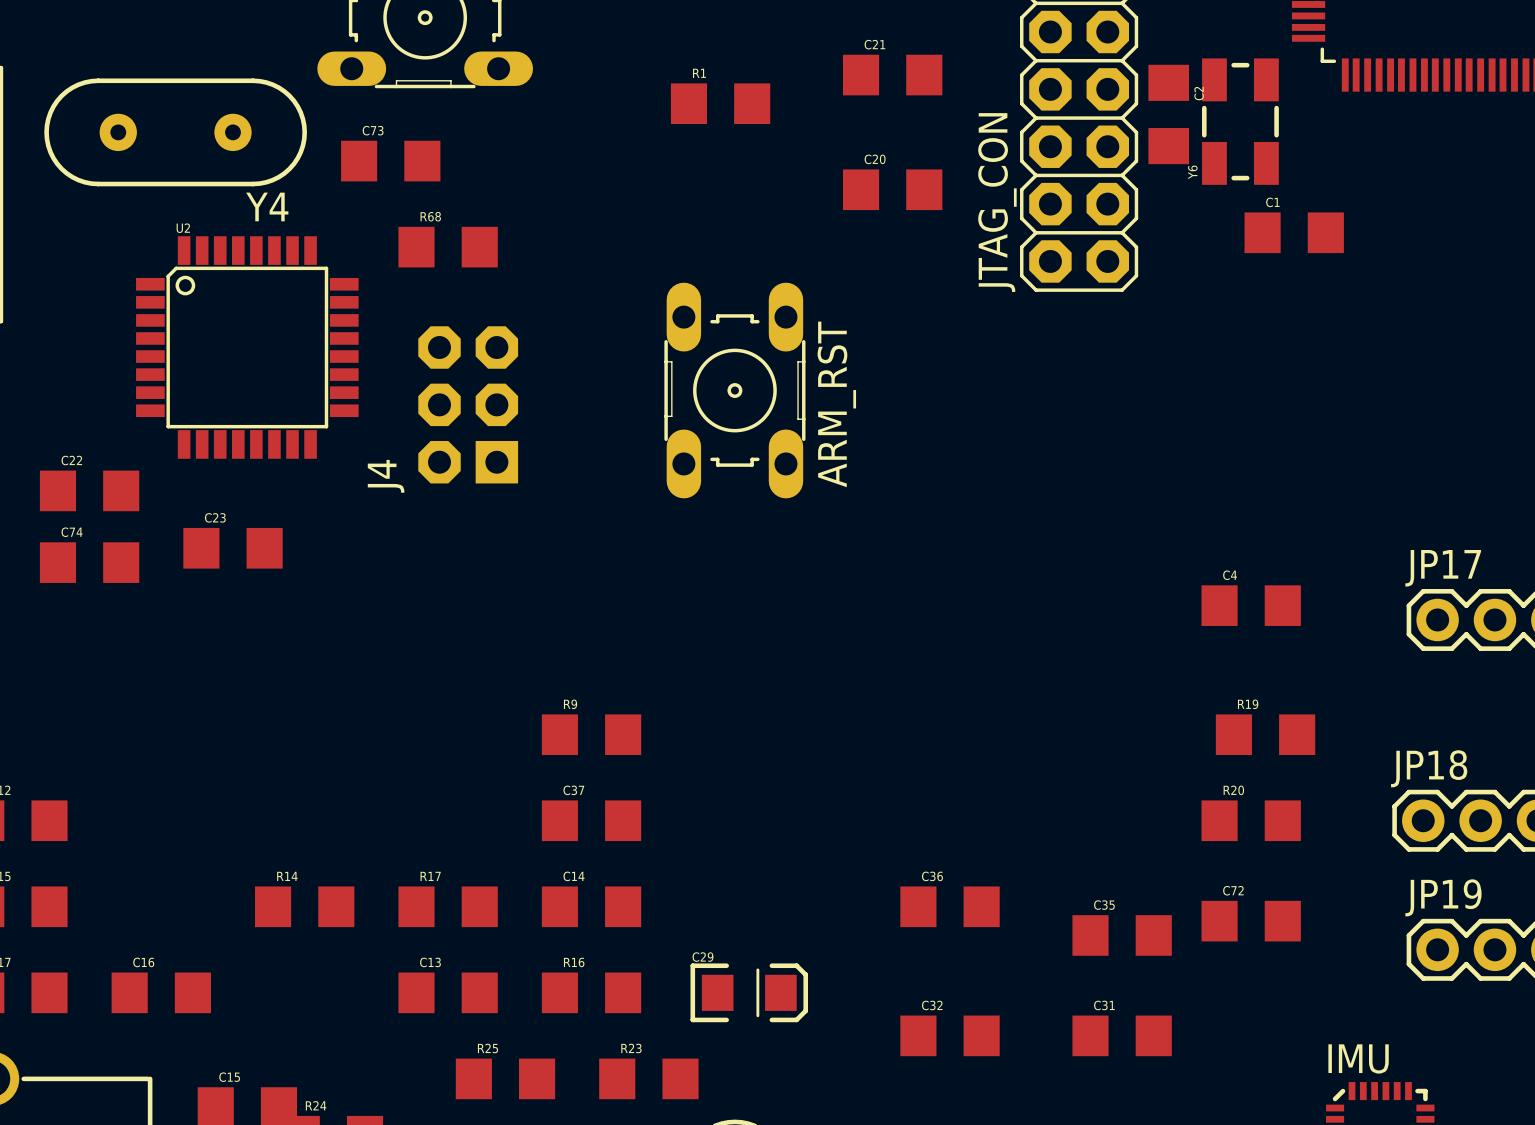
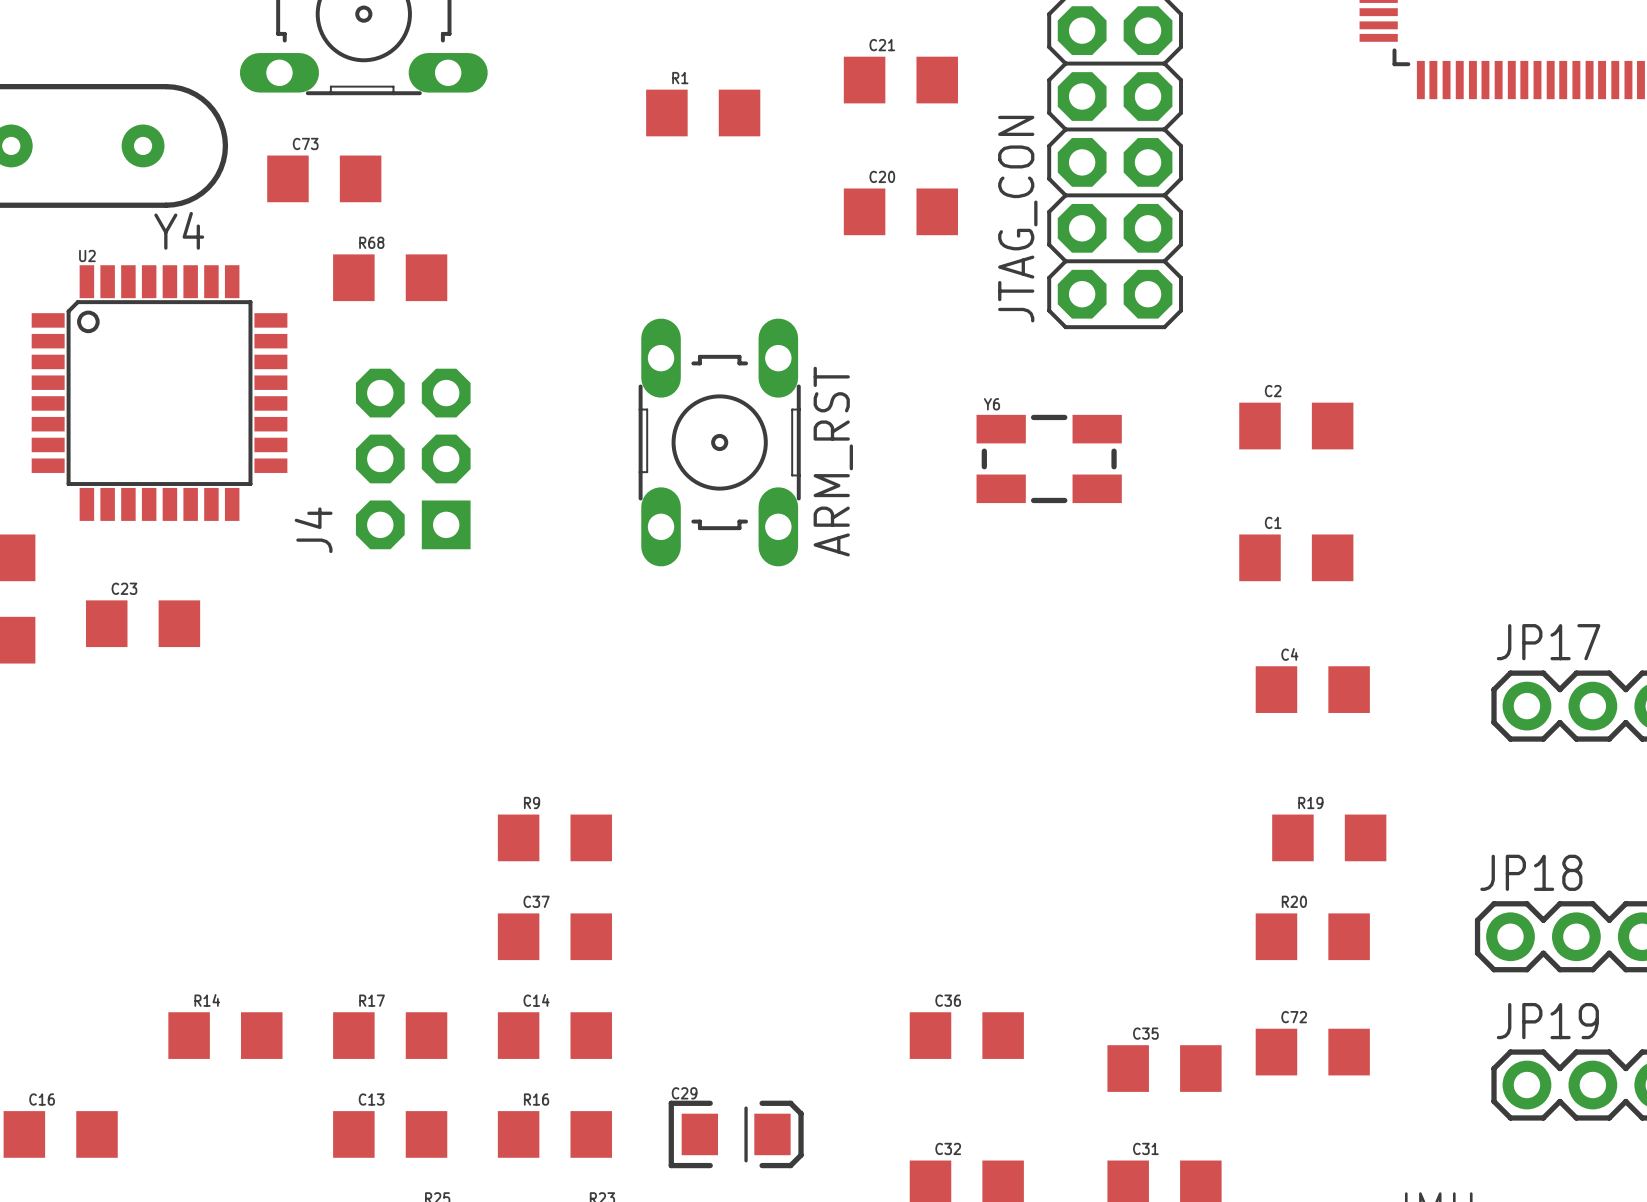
C2 name position: C2 (1199, 93) -> C2 (1273, 391)
C2 rotation: 0° (1168, 114) -> 90° clockwise (1296, 426)
C2 position: (1168, 114) -> (1296, 426)
Y6 rotation: 0° (1240, 121) -> 90° clockwise (1049, 458)
Y6 position: (1240, 121) -> (1049, 458)
C1 position: (1294, 232) -> (1296, 557)

